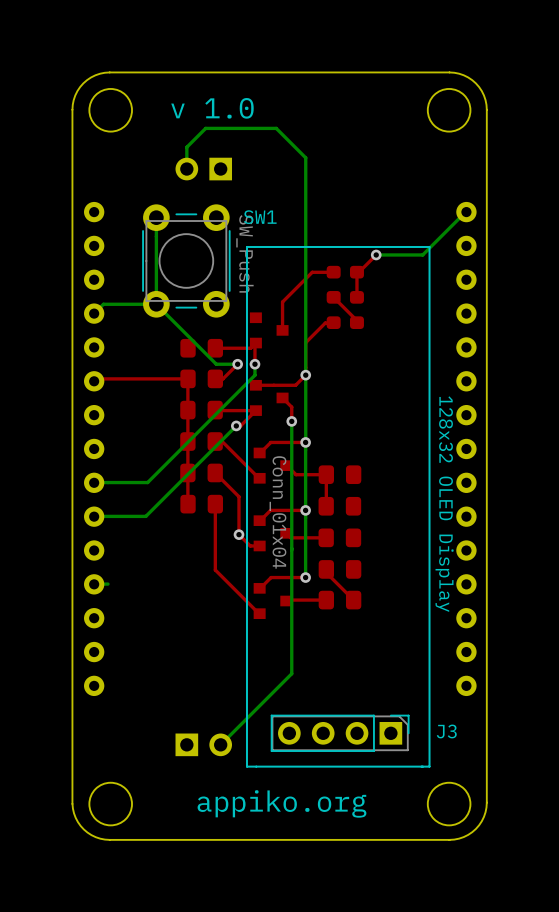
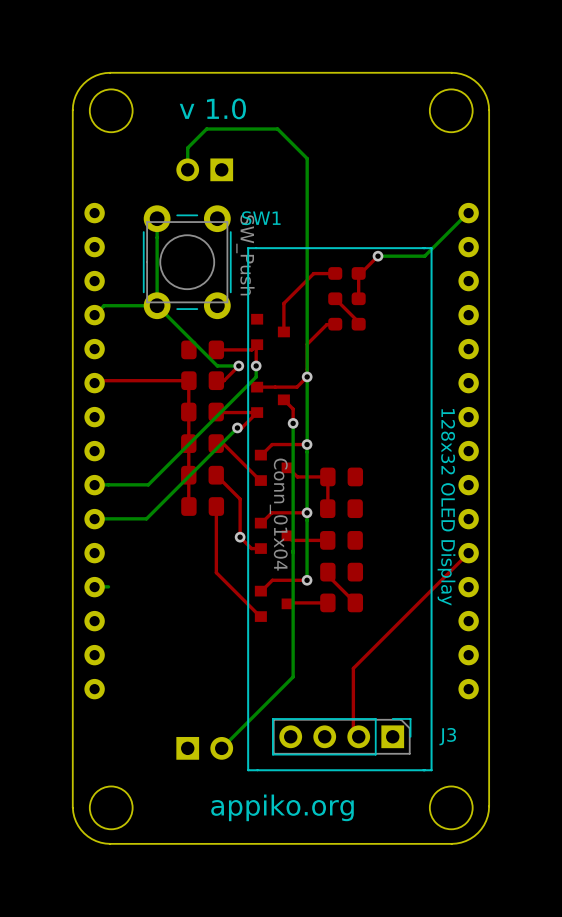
top track: none -> (468, 553) (353, 668) (353, 736)

